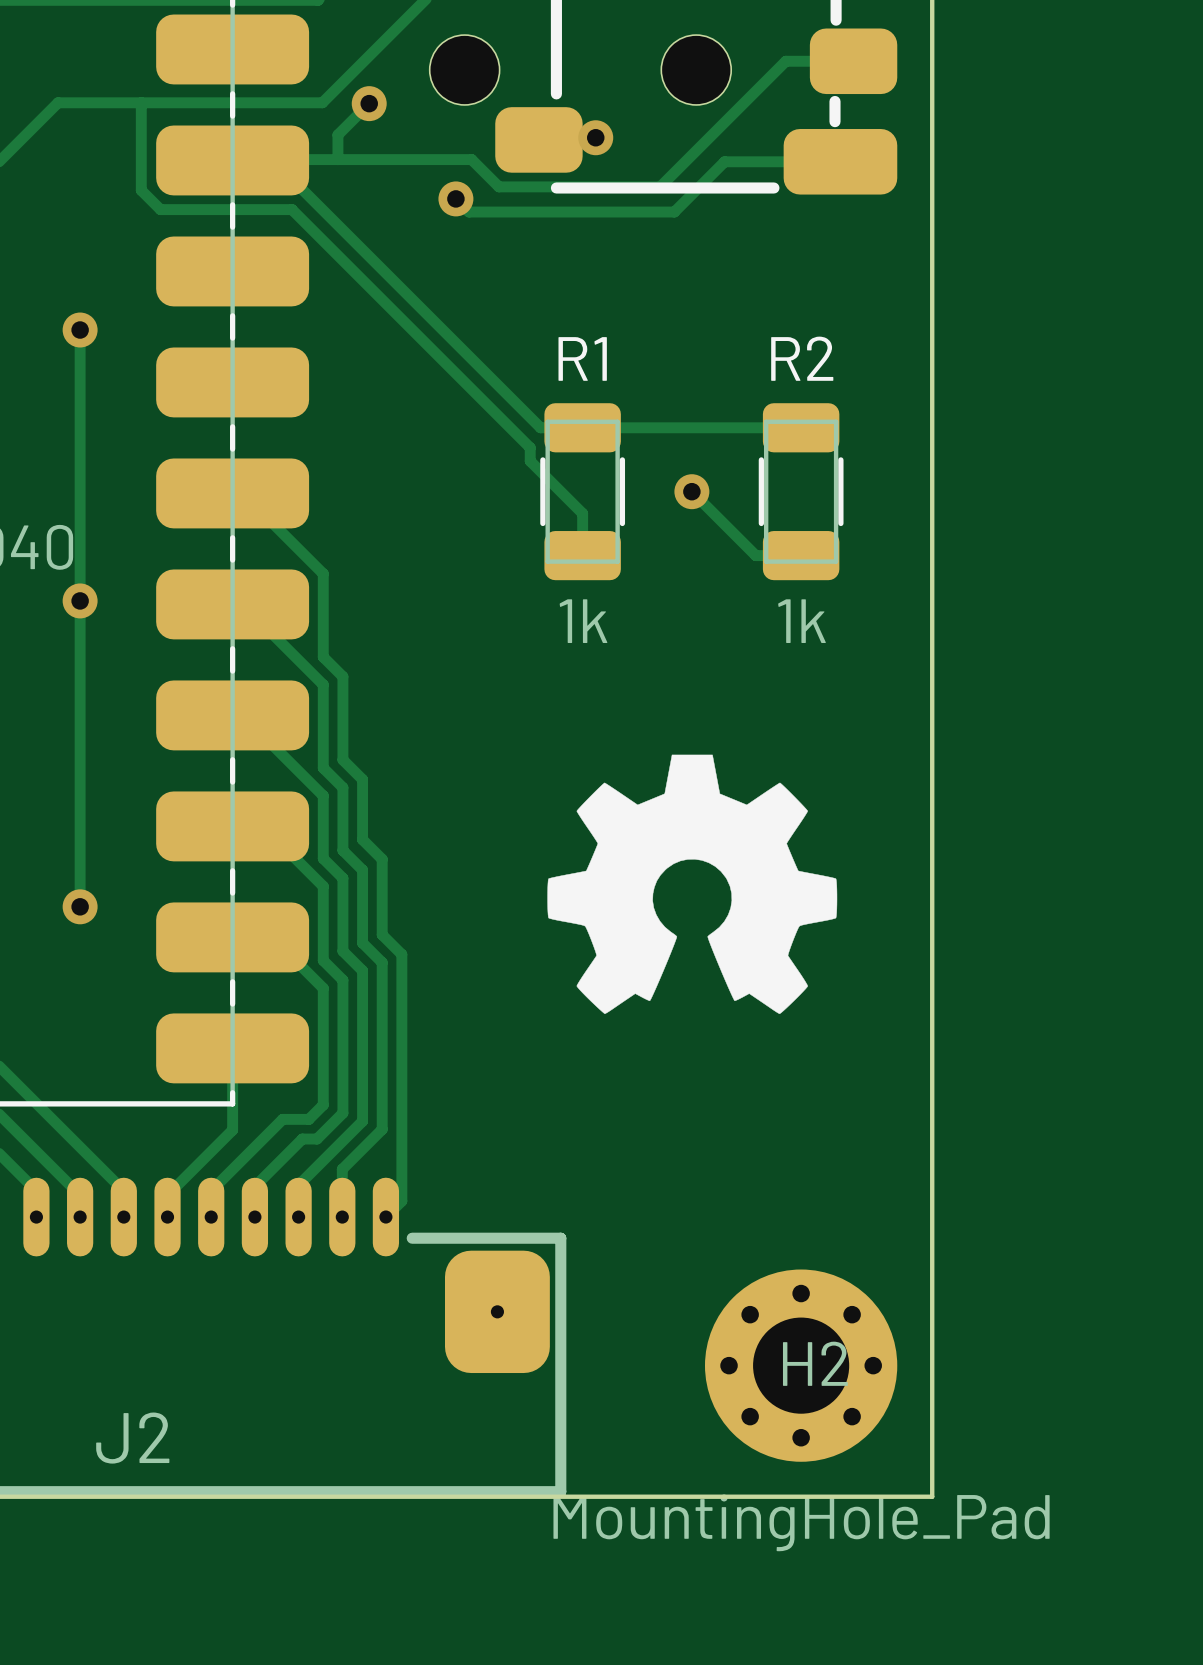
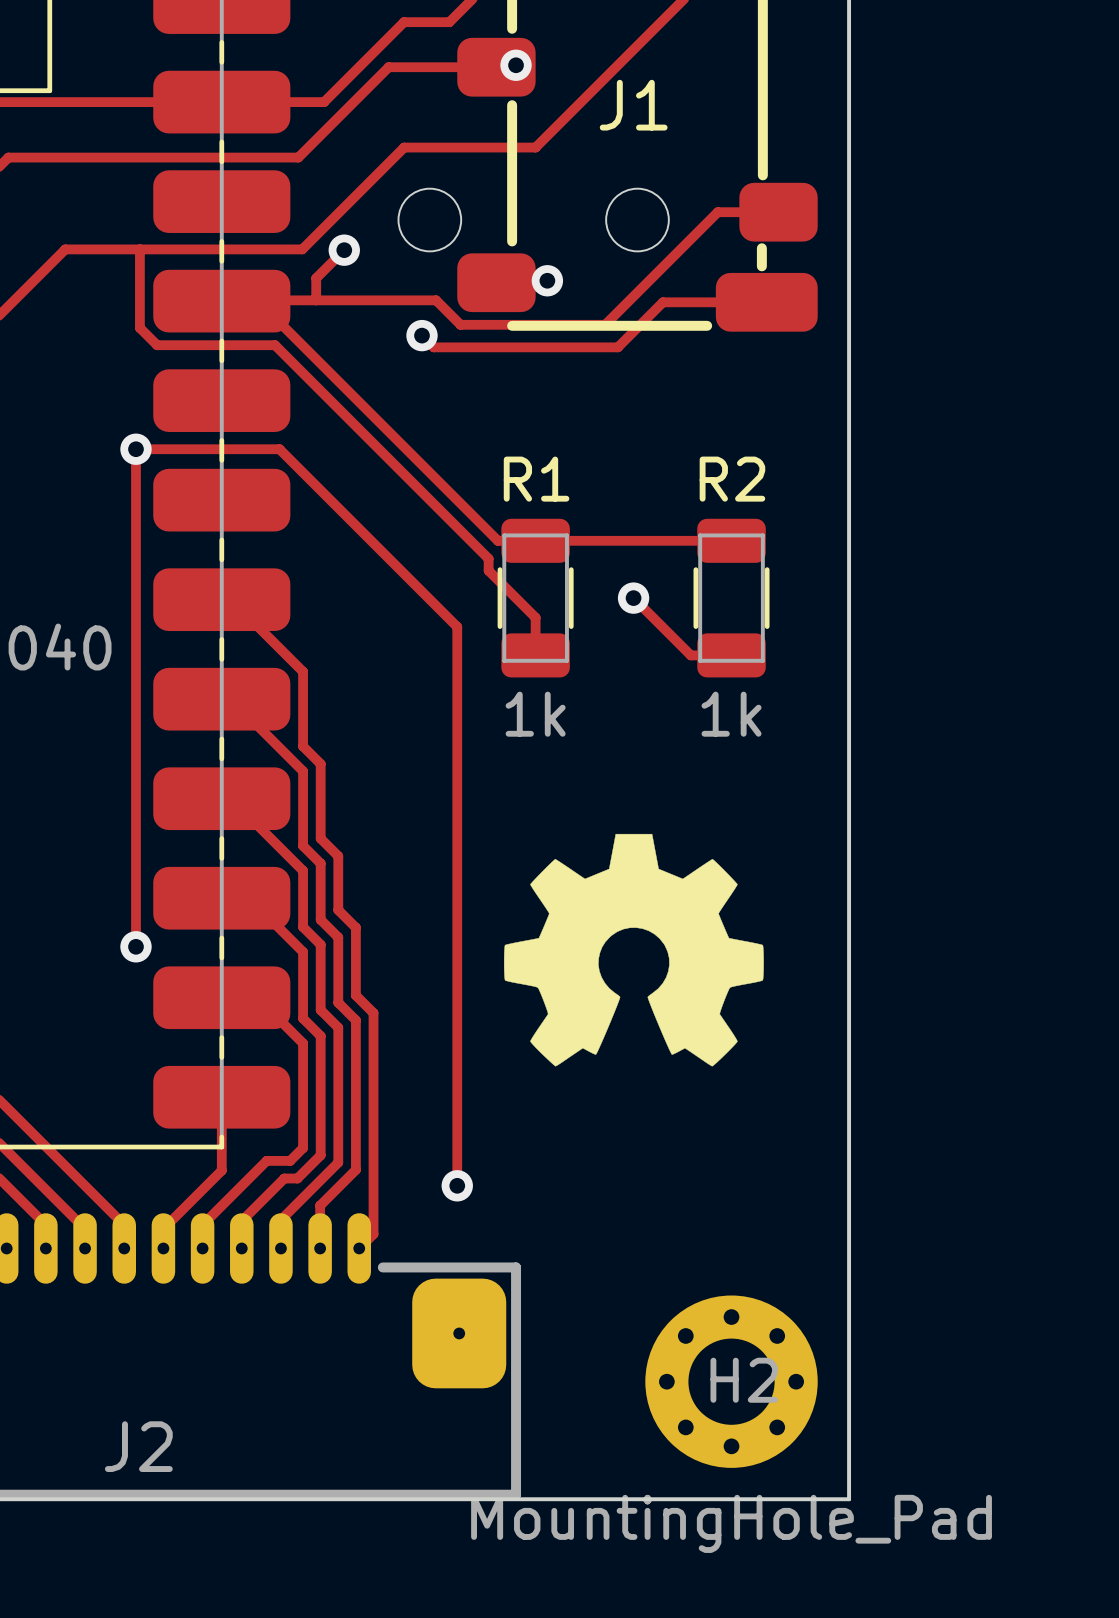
track: (80, 330) (80, 906) -> none
via position: (80, 330) -> (135, 449)
via: (80, 600) -> none
track: none -> (135, 946) (135, 449) (279, 449) (457, 626) (457, 1185)
via position: (80, 906) -> (135, 946)
via: none -> (457, 1185)

